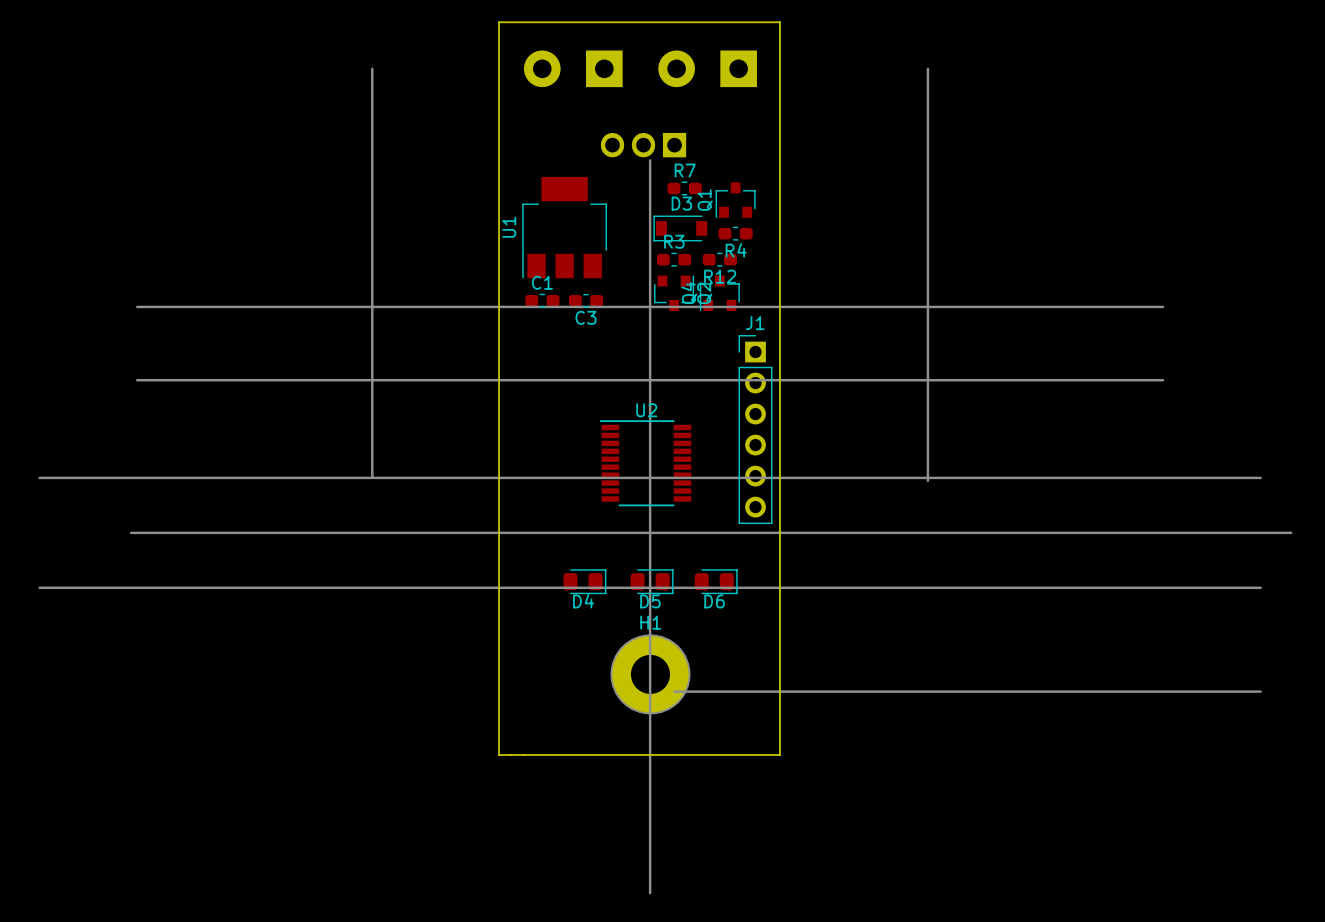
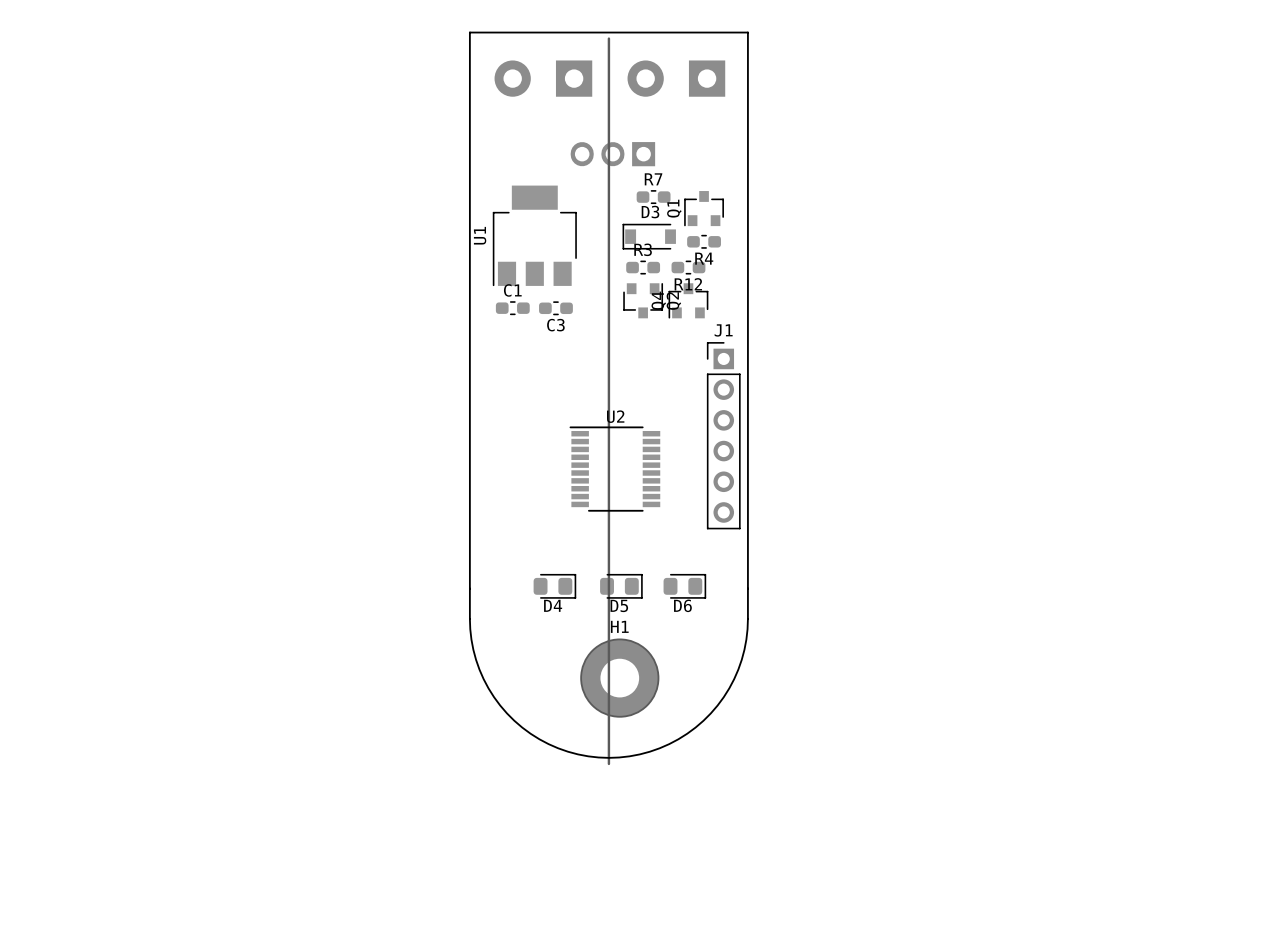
line: (372, 68) (372, 477) -> none
line: (927, 68) (927, 480) -> none
line: (650, 160) (650, 893) -> (608, 38) (608, 763)
line: (137, 306) (1163, 306) -> none
line: (137, 380) (1163, 380) -> none
line: (39, 477) (1260, 477) -> none
line: (131, 532) (1291, 532) -> none
line: (39, 587) (1260, 587) -> none
board edge: (499, 614) (499, 755) (779, 755) (779, 614) -> (469, 618) (471, 639) (479, 669) (488, 688) (507, 713) (522, 727) (548, 744) (577, 754) (608, 757) (639, 754) (659, 748) (687, 733) (703, 720) (723, 697) (738, 669) (746, 639) (747, 618)
line: (674, 691) (1260, 691) -> none

